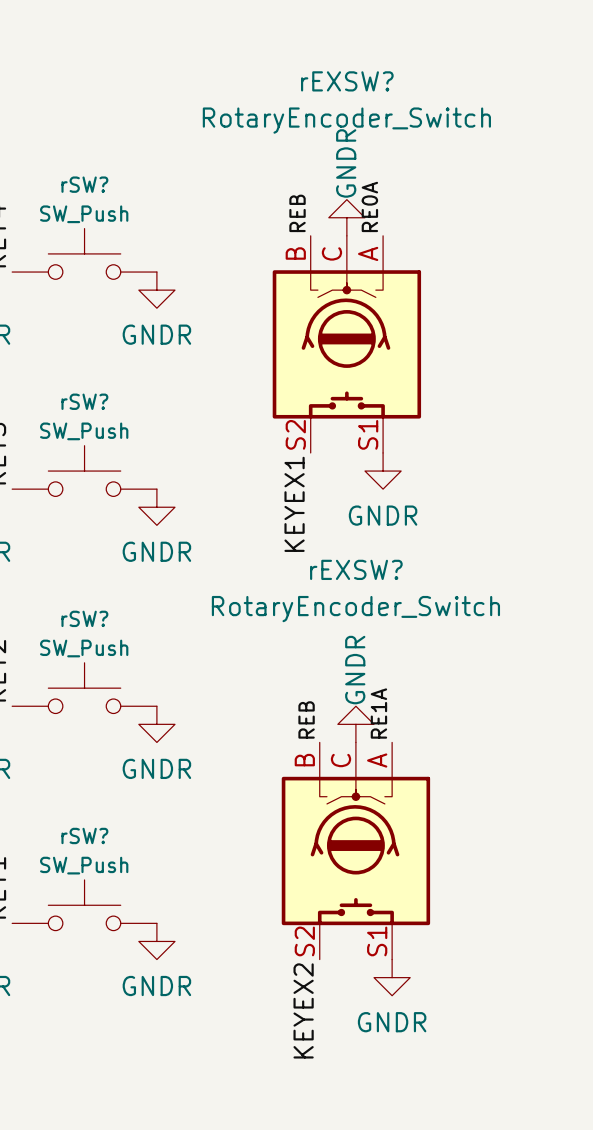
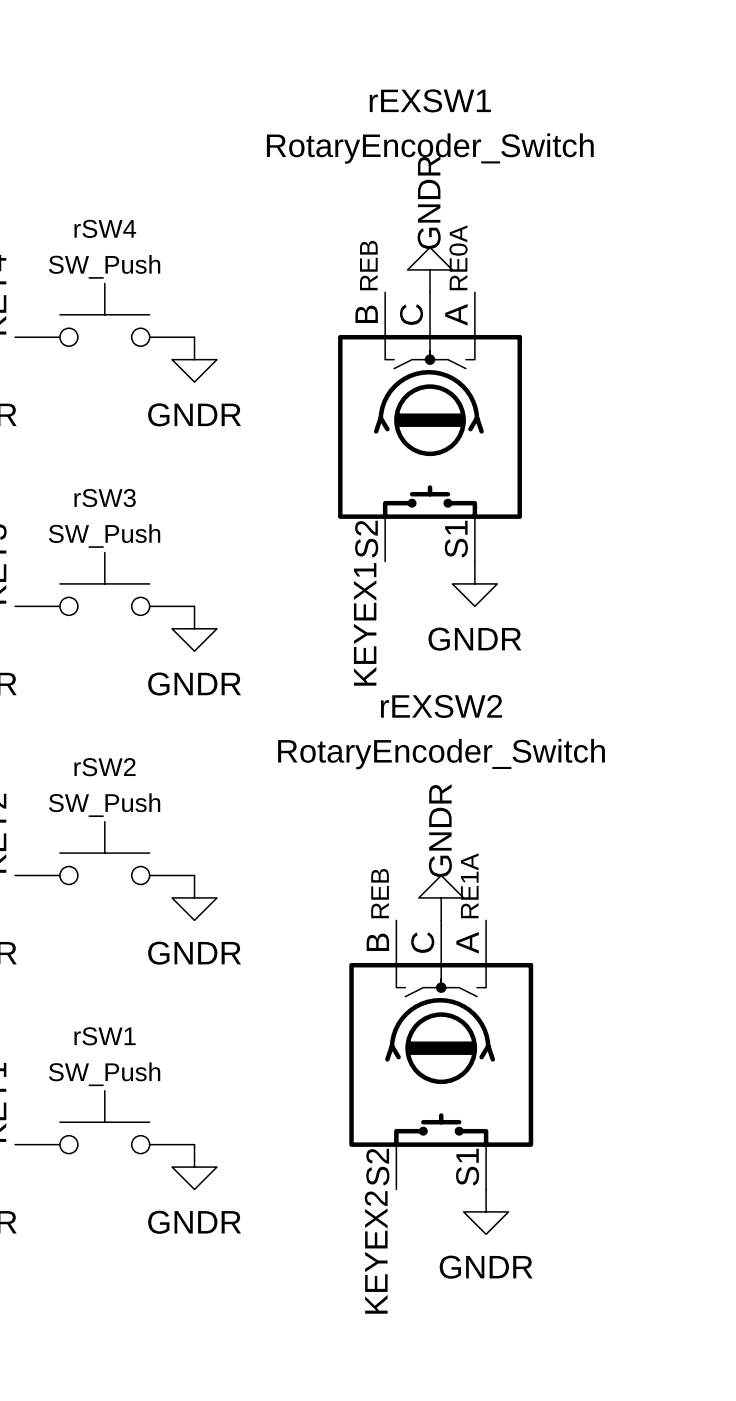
rEXSW? name: rEXSW? (347, 81) -> rEXSW1 (430, 100)
rSW? name: rSW? (84, 184) -> rSW4 (105, 228)
rSW? name: rSW? (84, 401) -> rSW3 (105, 498)
rEXSW? name: rEXSW? (356, 569) -> rEXSW2 (441, 706)
rSW? name: rSW? (84, 618) -> rSW2 (105, 767)
rSW? name: rSW? (84, 835) -> rSW1 (105, 1036)

